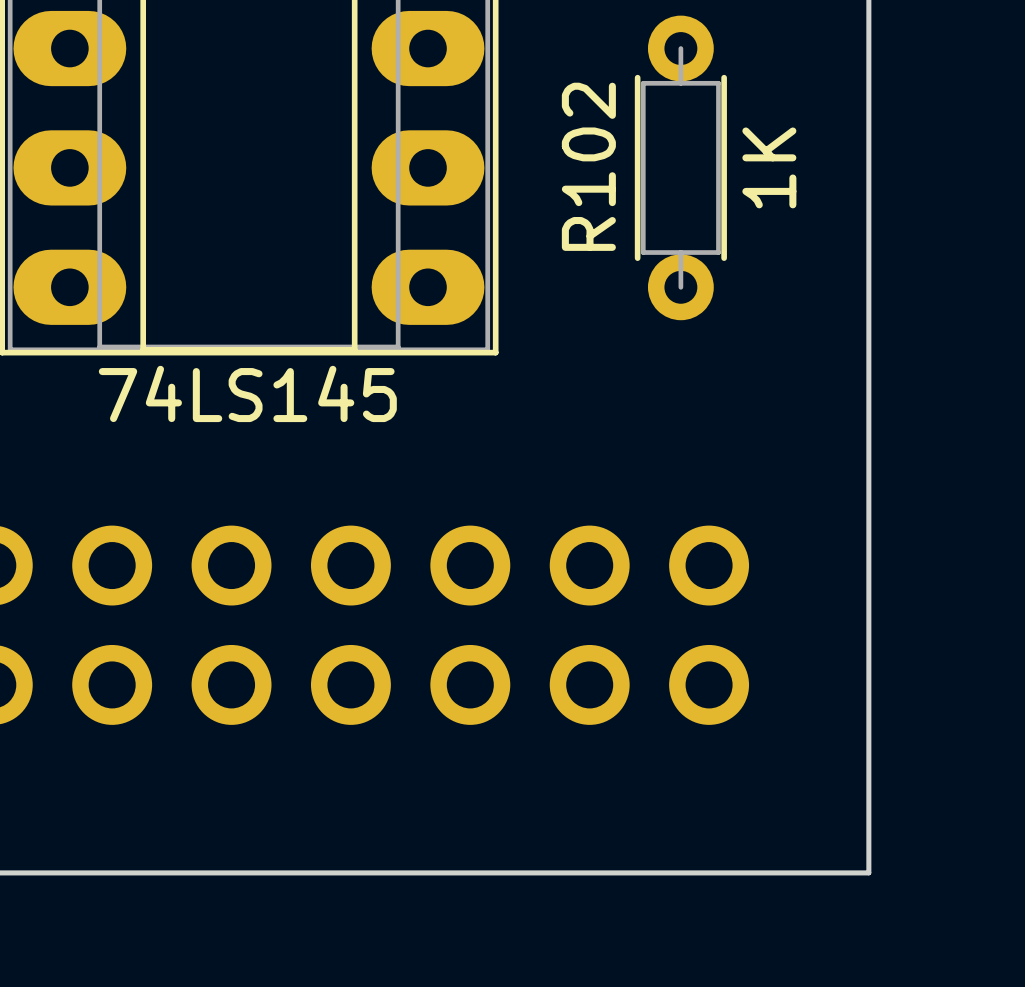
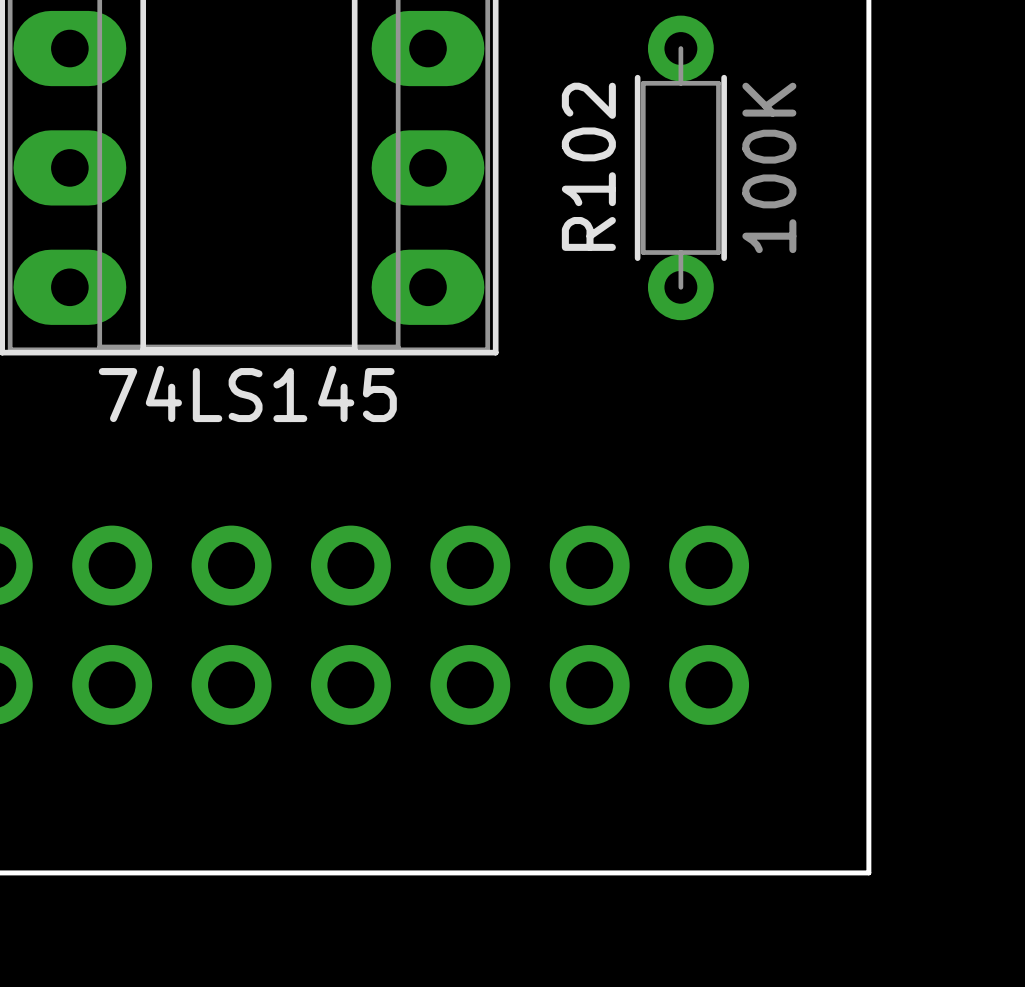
R102 value: 1K (769, 167) -> 100K (769, 167)

